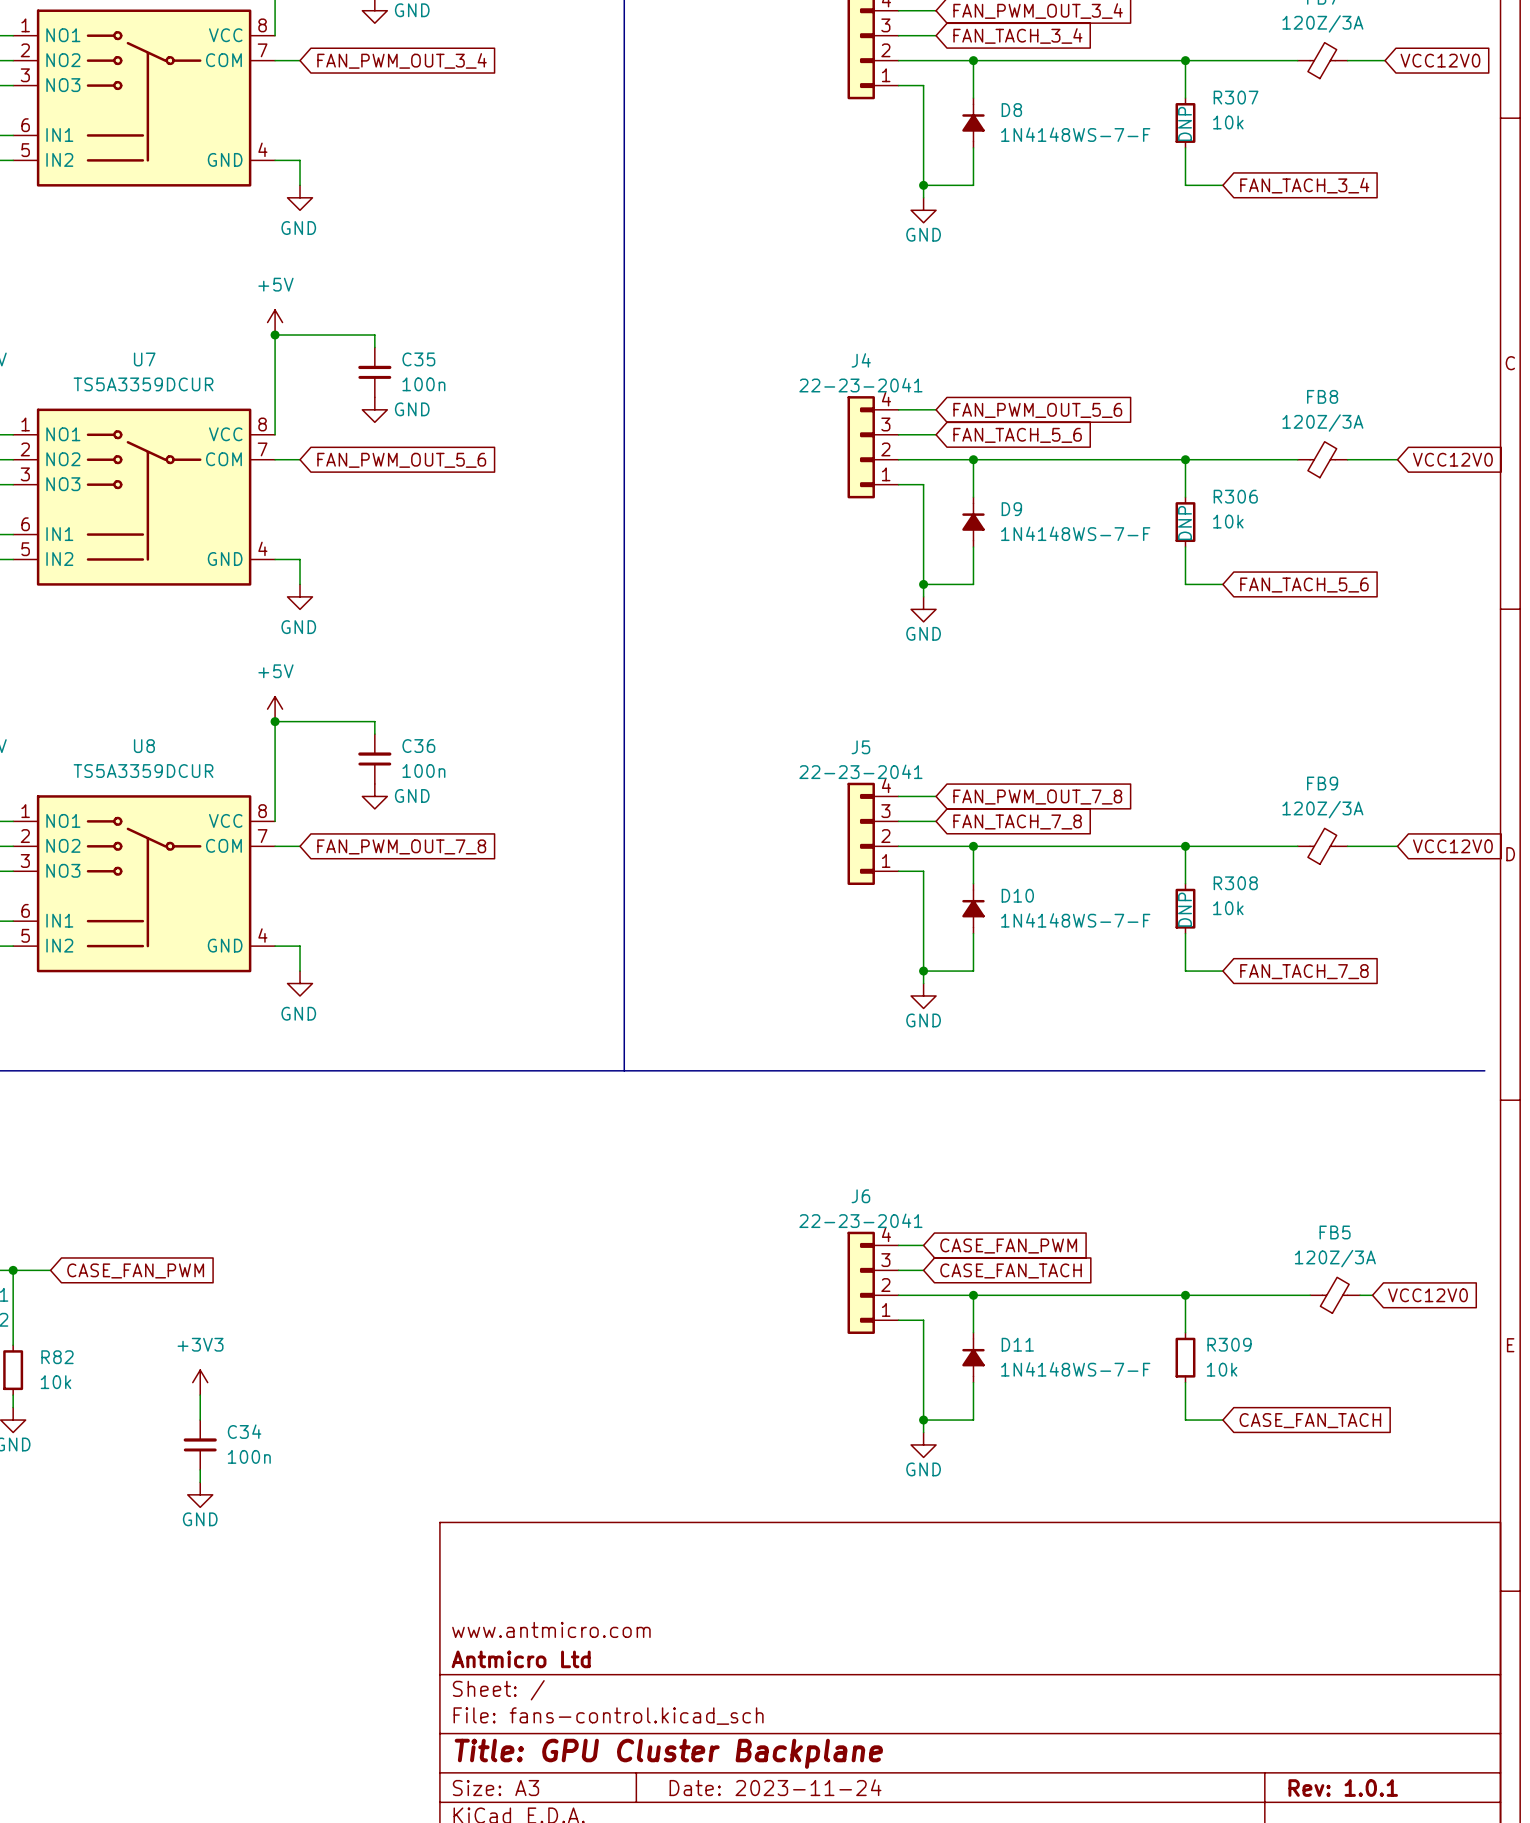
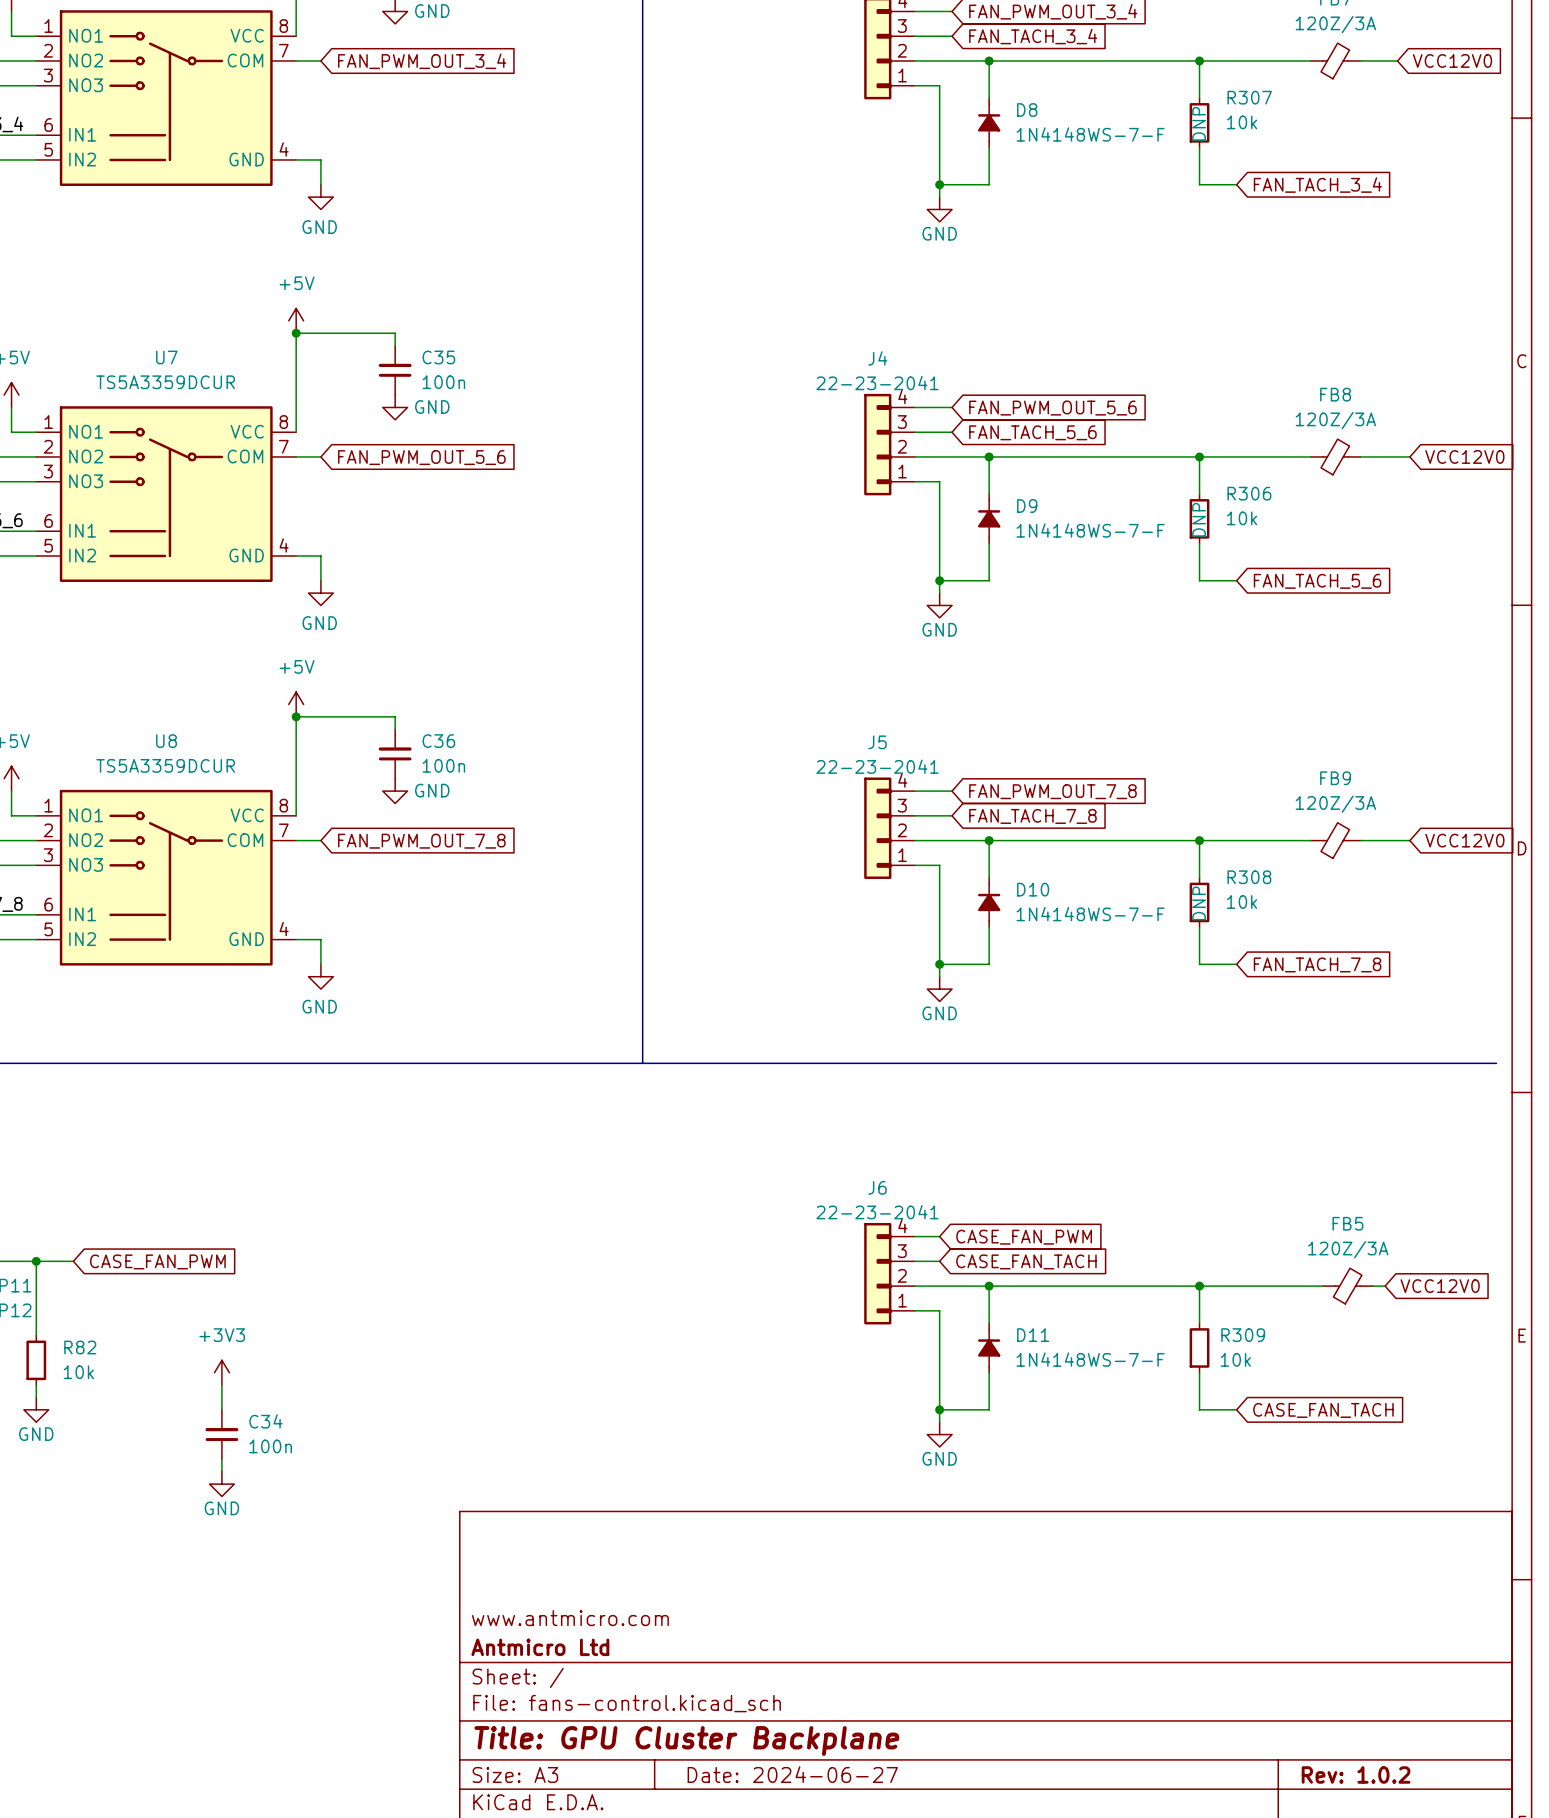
title block: Date: 2023-11-24 (775, 1787) -> Date: 2024-06-27 (792, 1774)
title block: Rev: 1.0.1 (1343, 1788) -> Rev: 1.0.2 (1356, 1774)

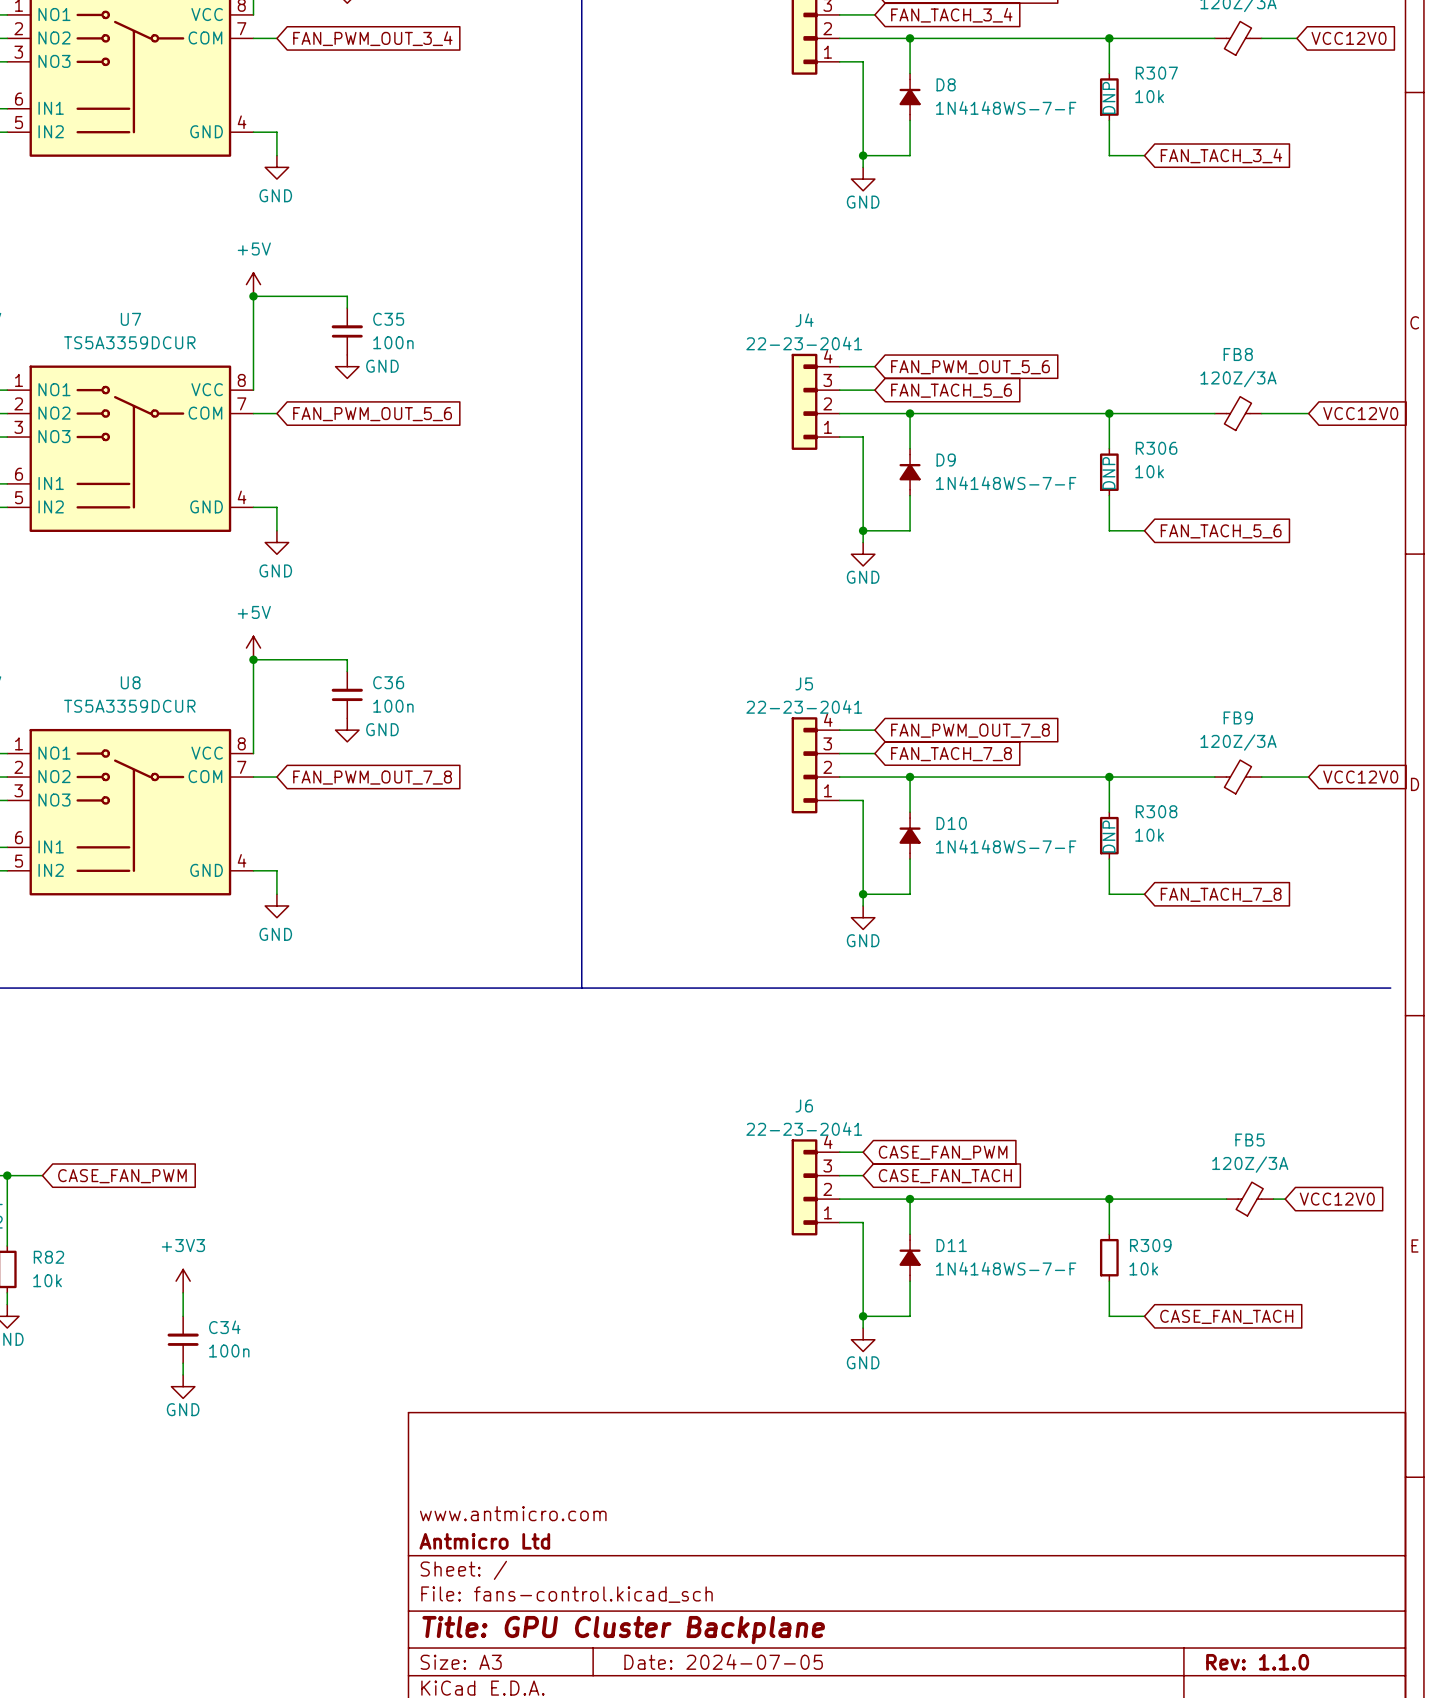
title block: Date: 2024-06-27 (792, 1774) -> Date: 2024-07-05 (723, 1661)
title block: Rev: 1.0.2 (1356, 1774) -> Rev: 1.1.0 (1257, 1662)

